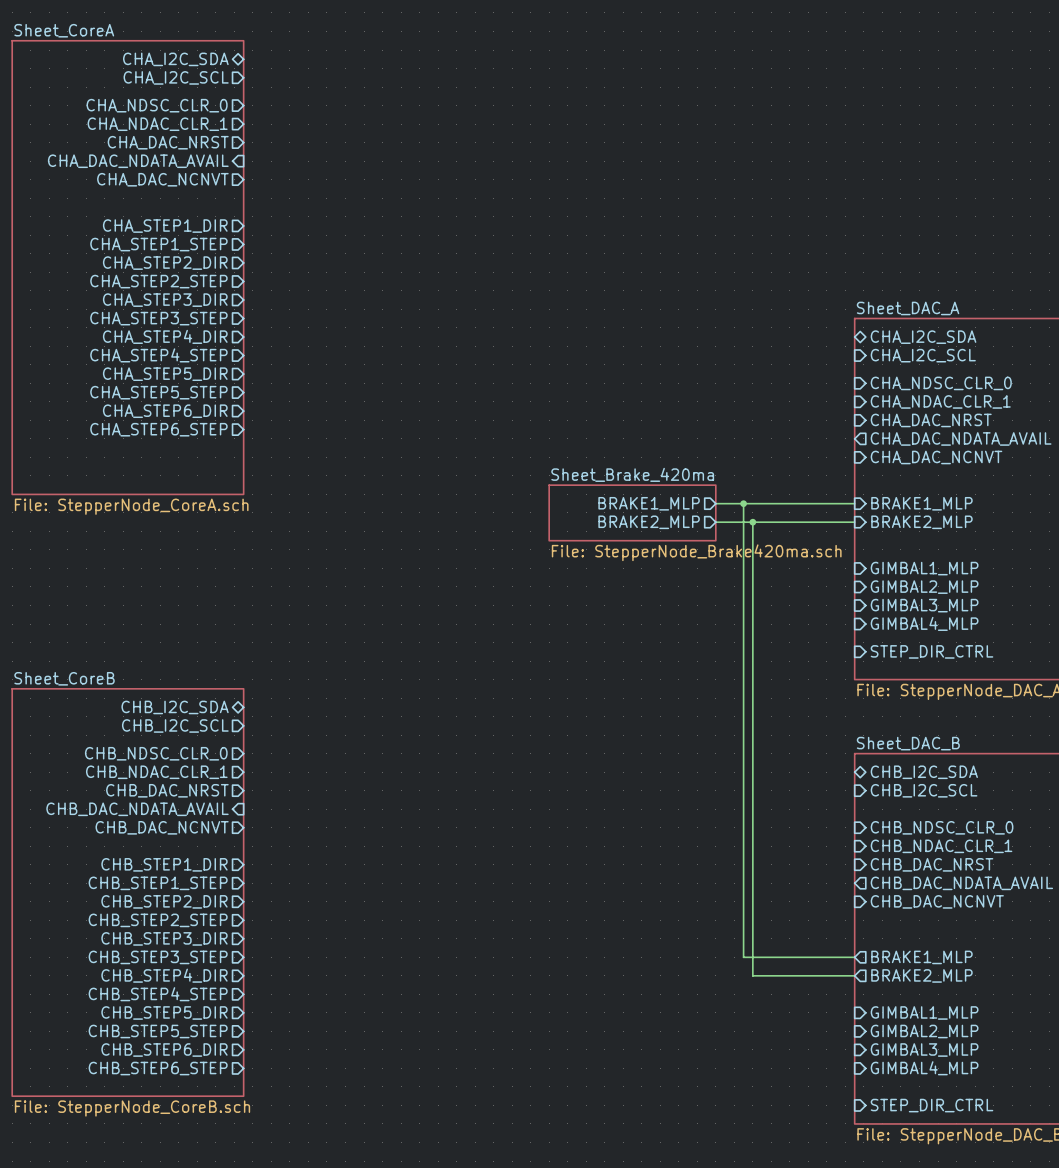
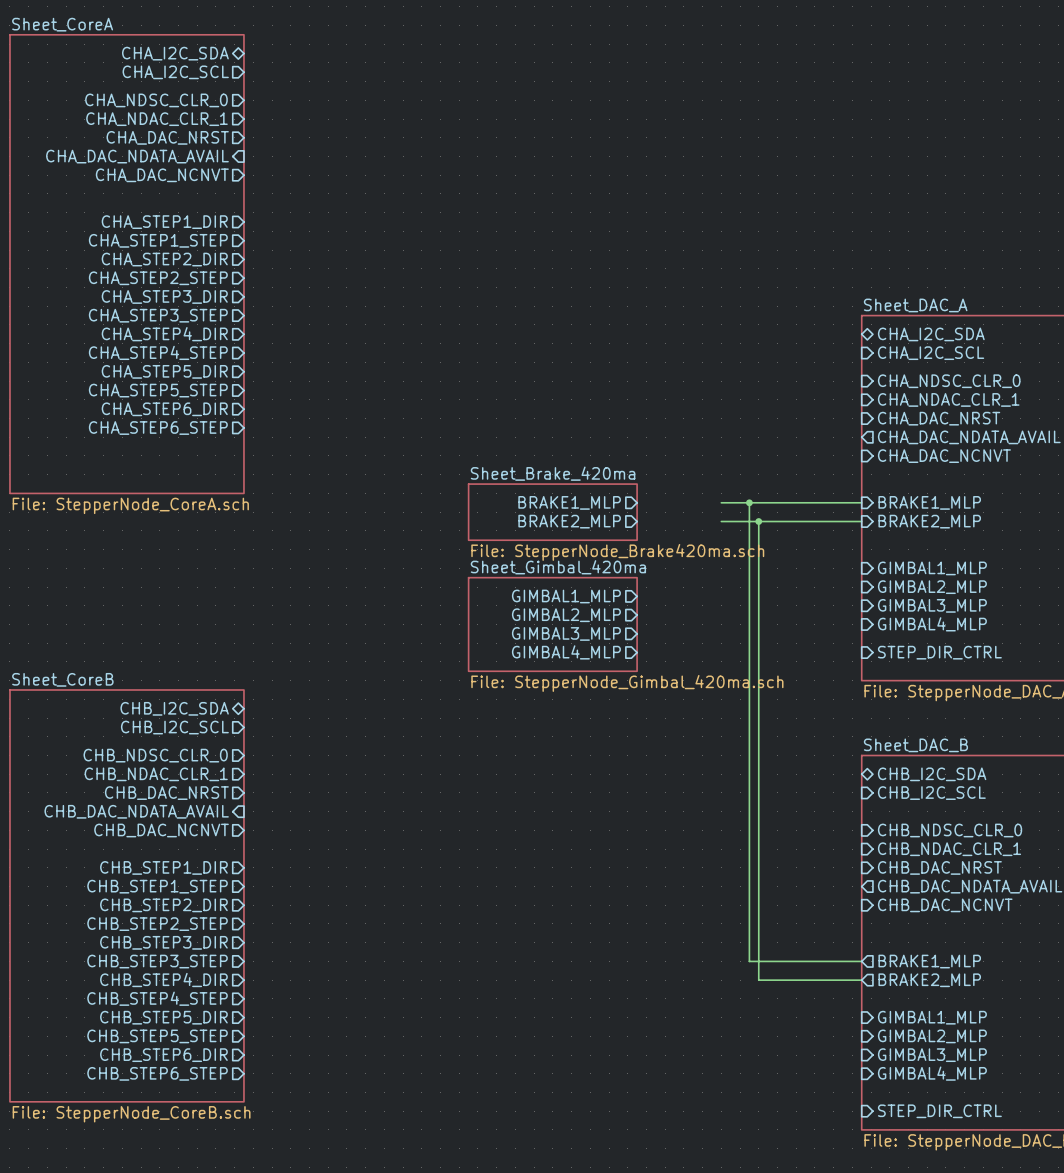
sheet pin position: BRAKE1_MLP (649, 503) -> BRAKE1_MLP (569, 502)
sheet Sheet_Brake_420ma position: (632, 512) -> (552, 512)
sheet pin position: BRAKE2_MLP (649, 522) -> BRAKE2_MLP (569, 521)
sheet pin: none -> GIMBAL1_MLP (566, 596)
sheet pin: none -> GIMBAL2_MLP (566, 615)
sheet Sheet_Gimbal_420ma: none -> File: StepperNode_Gimbal_420ma.sch (552, 624)
sheet pin: none -> GIMBAL3_MLP (566, 633)
sheet pin: none -> GIMBAL4_MLP (566, 652)

